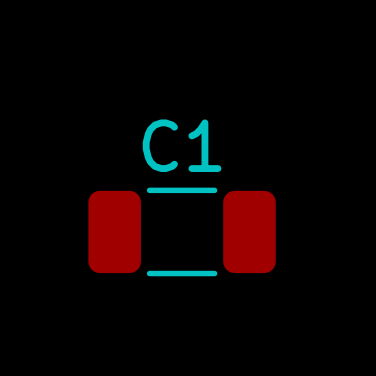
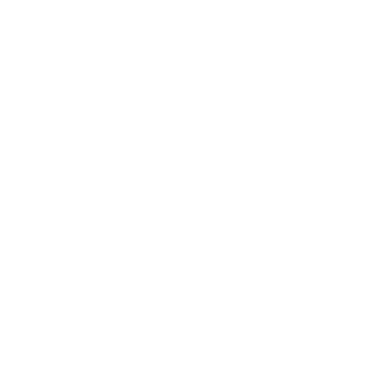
C1: (182, 231) -> none

